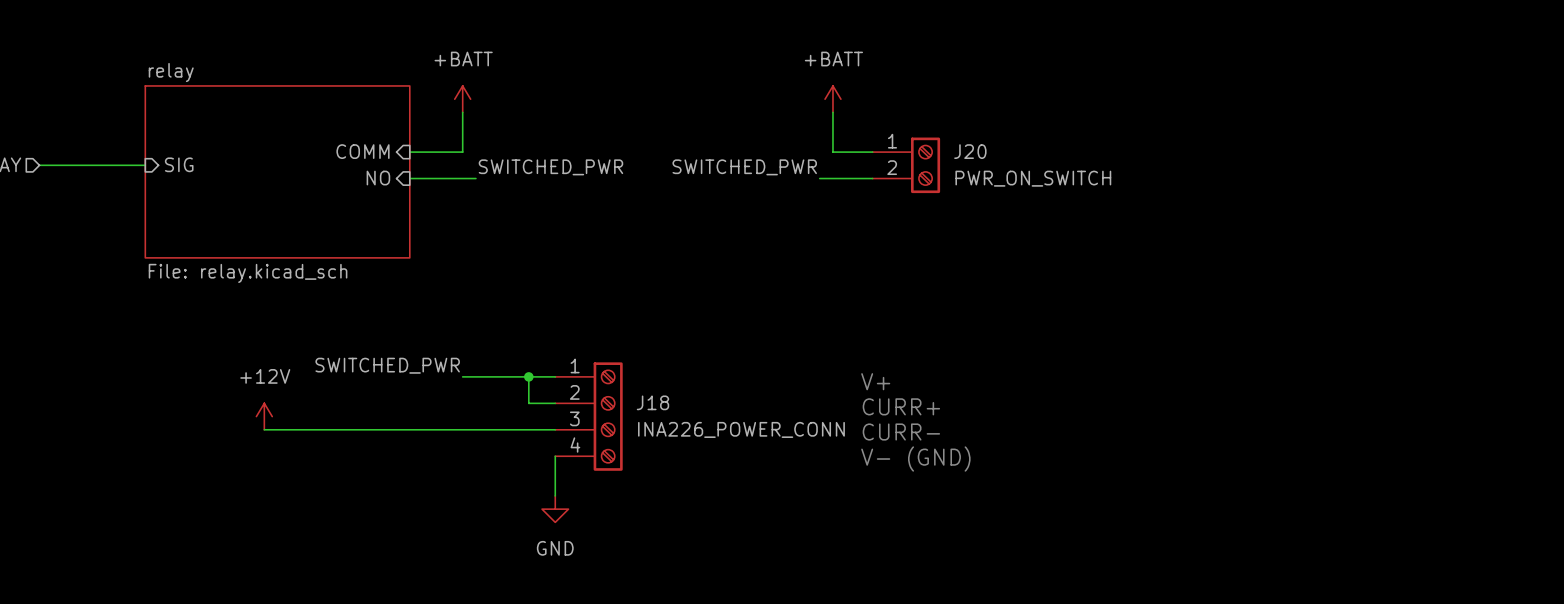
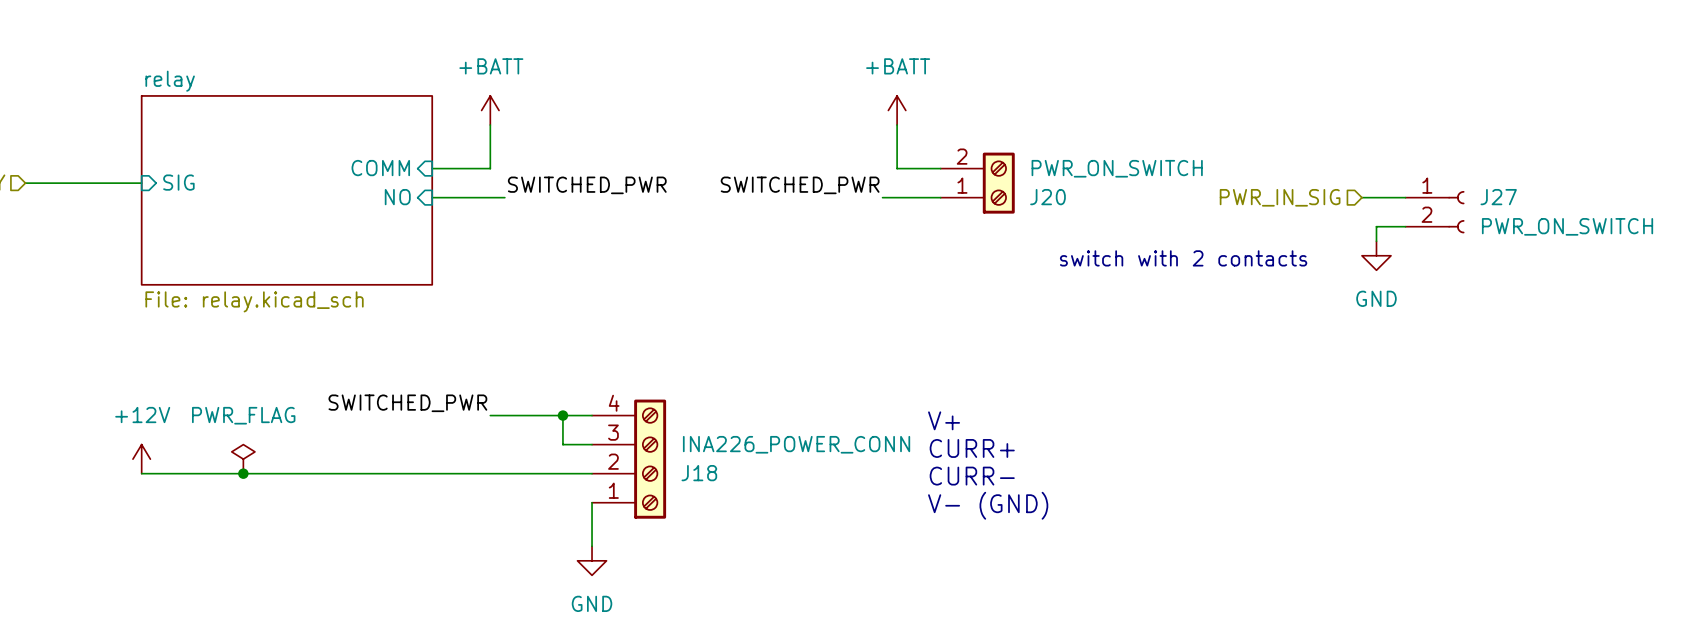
J20 flip: as is (925, 165) -> up-down (998, 183)
hierarchical label: none -> PWR_IN_SIG (1280, 197)
wire: none -> (1361, 197) (1405, 197)
J27: none -> PWR_ON_SWITCH (1435, 212)
wire: none -> (1405, 226) (1376, 226) (1376, 241)
power symbol: none -> GND (1376, 255)
text: none -> switch with 2 contacts (1183, 258)
power symbol: none -> PWR_FLAG (243, 459)
power symbol position: +12V (264, 416) -> +12V (141, 459)
J18 flip: as is (608, 416) -> up-down (650, 459)
wire: none -> (141, 473) (272, 473)
junction: none -> (243, 473)

